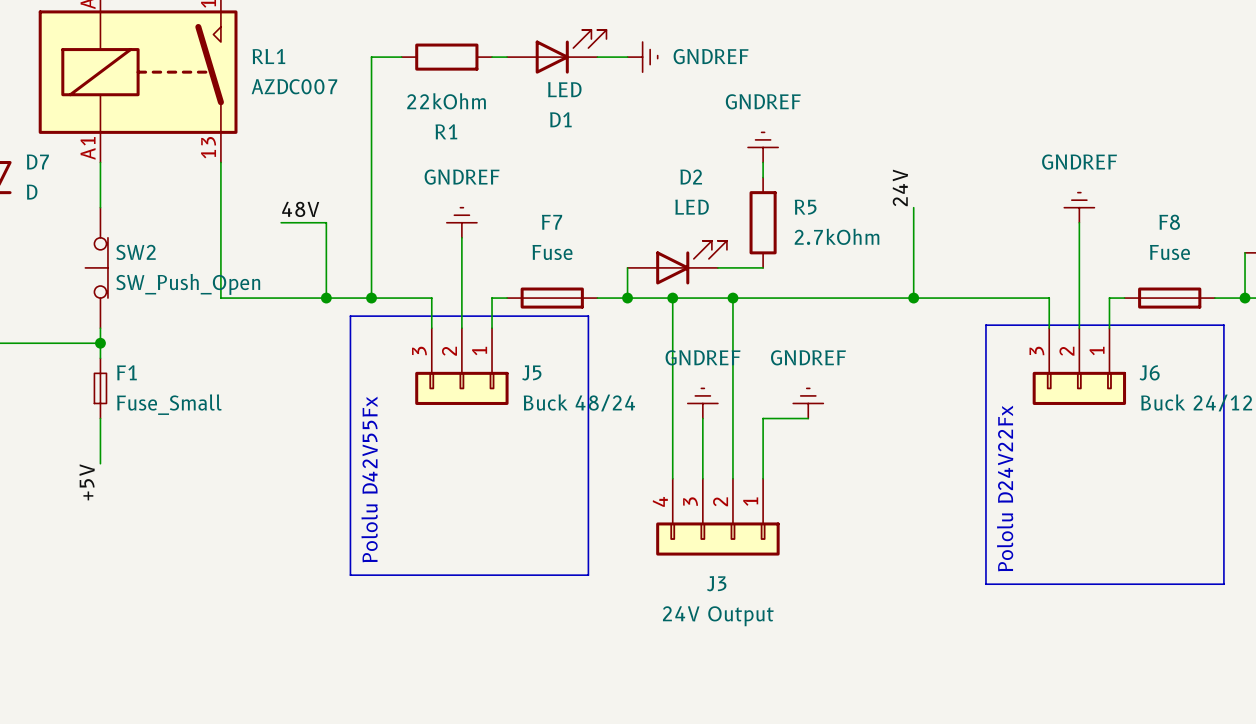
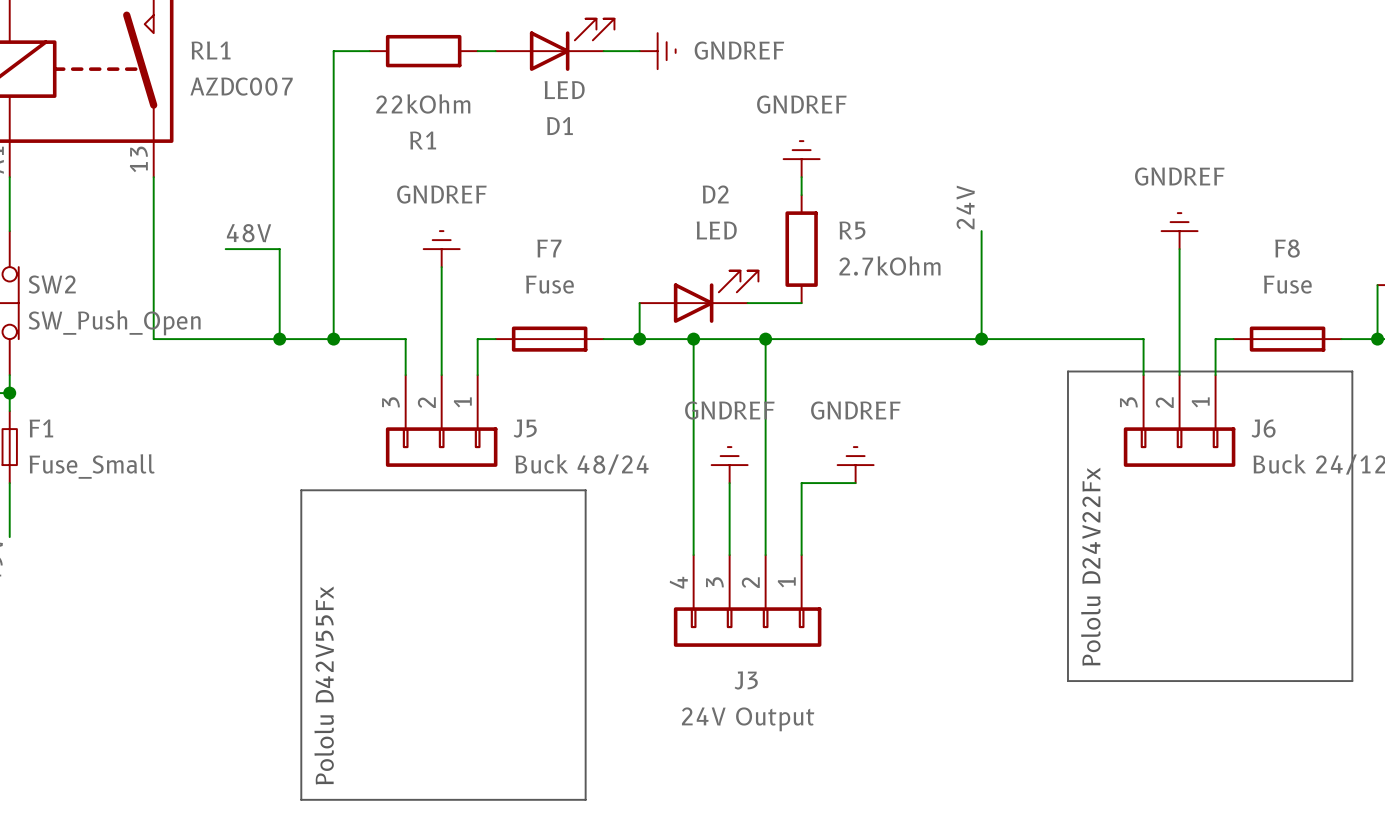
line: (350, 316) (588, 316) (588, 575) (350, 575) (350, 316) -> (301, 490) (585, 490) (585, 799) (301, 799) (301, 490)
text position: Pololu D42V55Fx (369, 479) -> Pololu D42V55Fx (324, 685)

